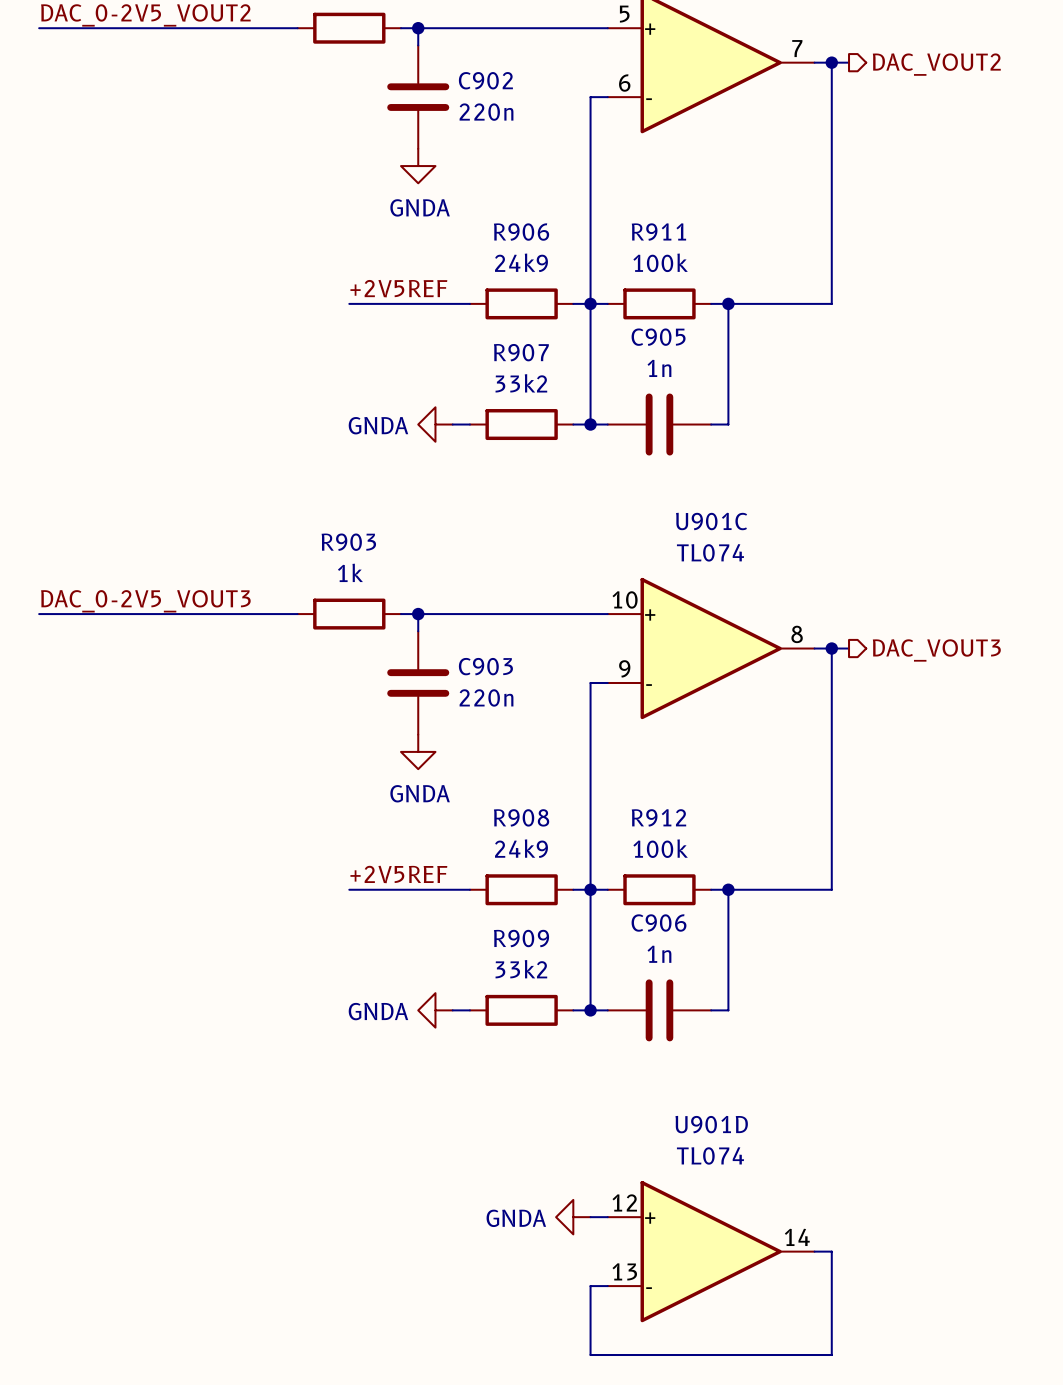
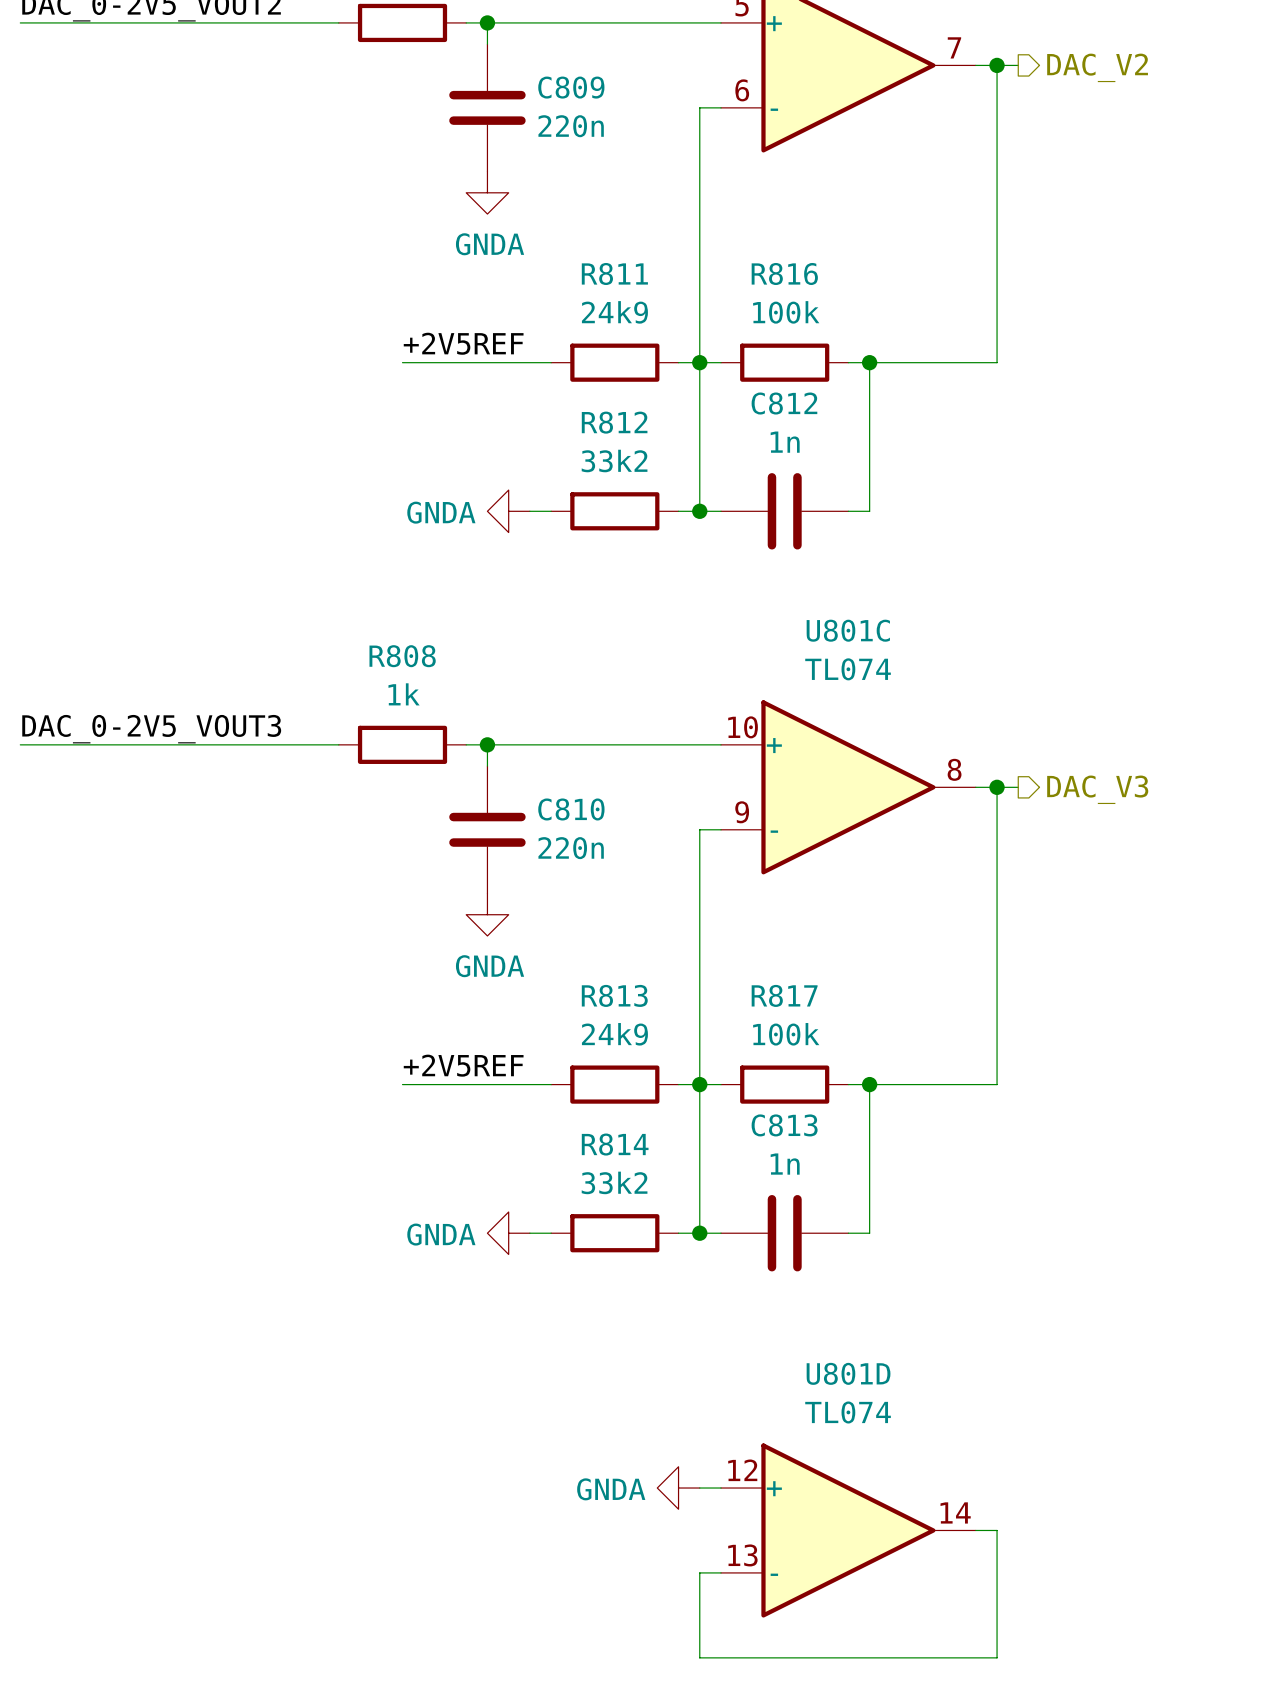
hierarchical label: DAC_VOUT2 (936, 64) -> DAC_V2 (1097, 67)
C902 name: C902 (485, 80) -> C809 (571, 87)
R906 name: R906 (521, 232) -> R811 (614, 273)
R911 name: R911 (658, 232) -> R816 (784, 273)
C905 name: C905 (658, 337) -> C812 (784, 403)
R907 name: R907 (521, 352) -> R812 (614, 422)
U901C name: U901C (711, 521) -> U801C (848, 630)
R903 name: R903 (348, 542) -> R808 (402, 656)
hierarchical label: DAC_VOUT3 (936, 650) -> DAC_V3 (1097, 789)
C903 name: C903 (485, 666) -> C810 (571, 809)
R908 name: R908 (521, 817) -> R813 (614, 995)
R912 name: R912 (658, 817) -> R817 (784, 995)
C906 name: C906 (659, 923) -> C813 (784, 1125)
R909 name: R909 (521, 938) -> R814 (615, 1144)
U901D name: U901D (711, 1124) -> U801D (848, 1373)

